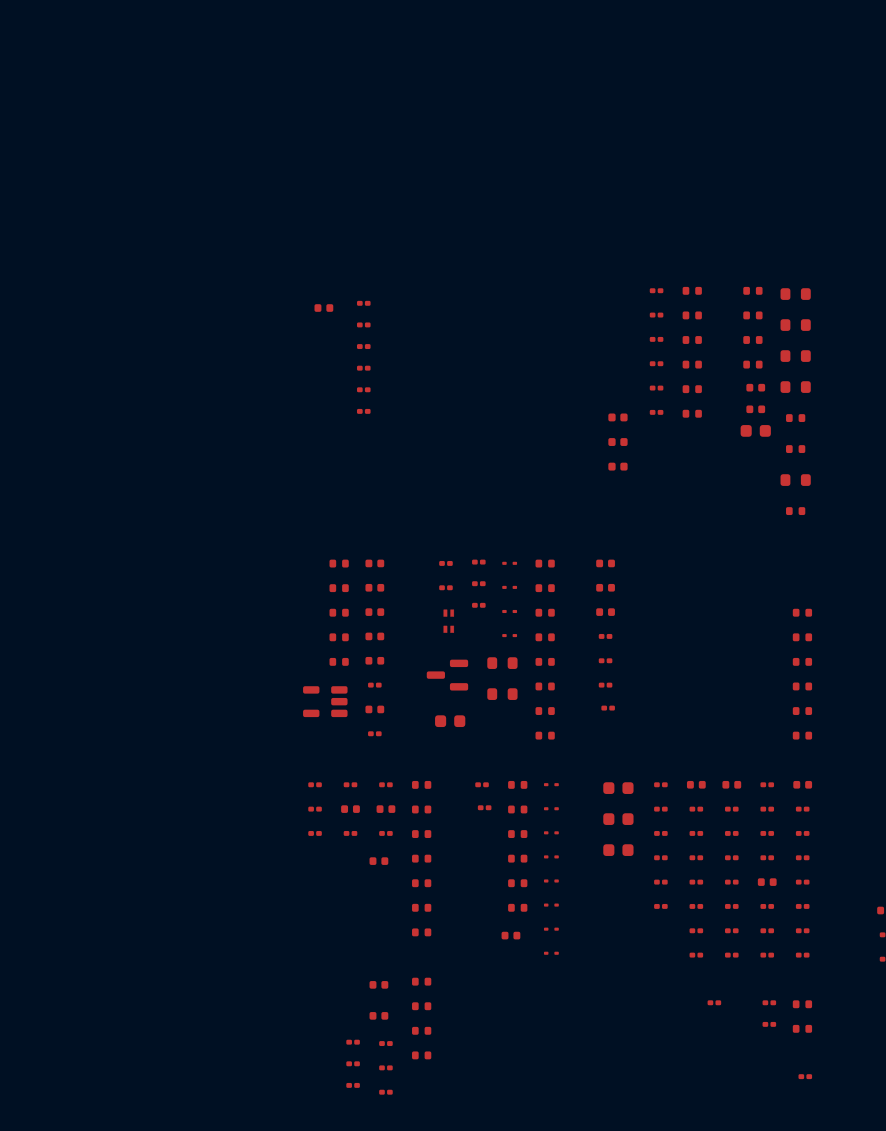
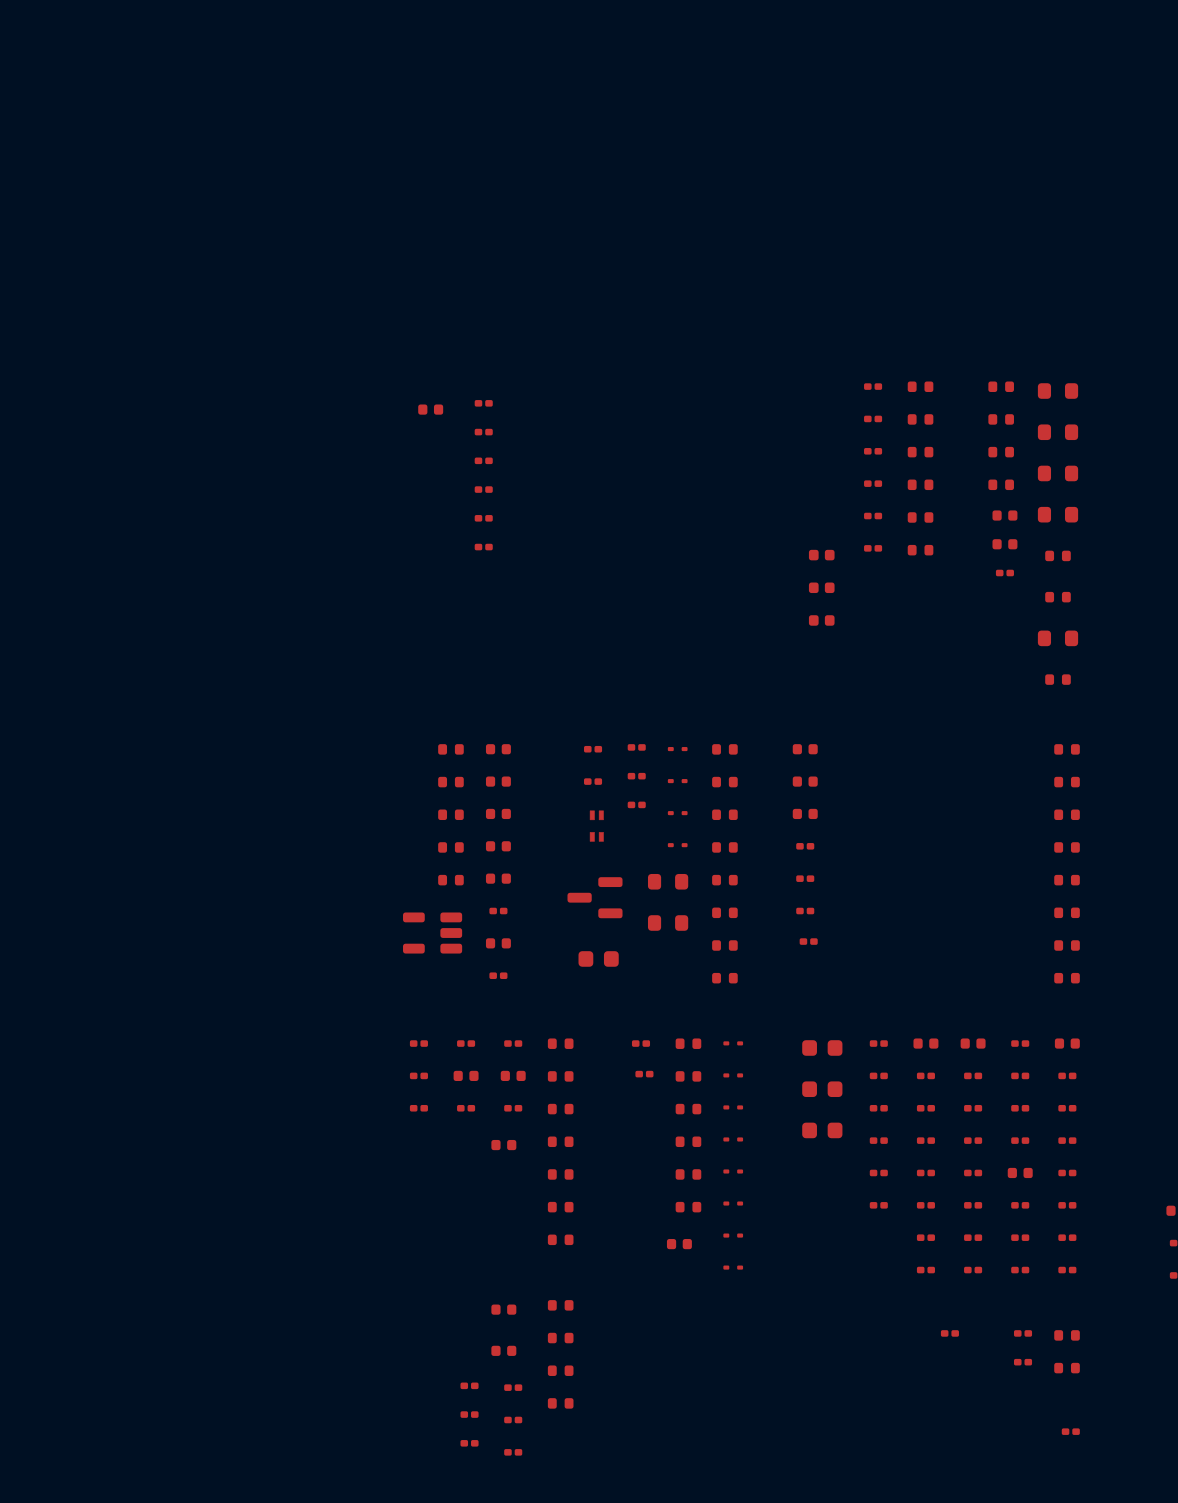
part footprint: [740, 425, 771, 437] -> [995, 569, 1014, 577]
part: none -> (1067, 749)
part: none -> (1067, 782)

